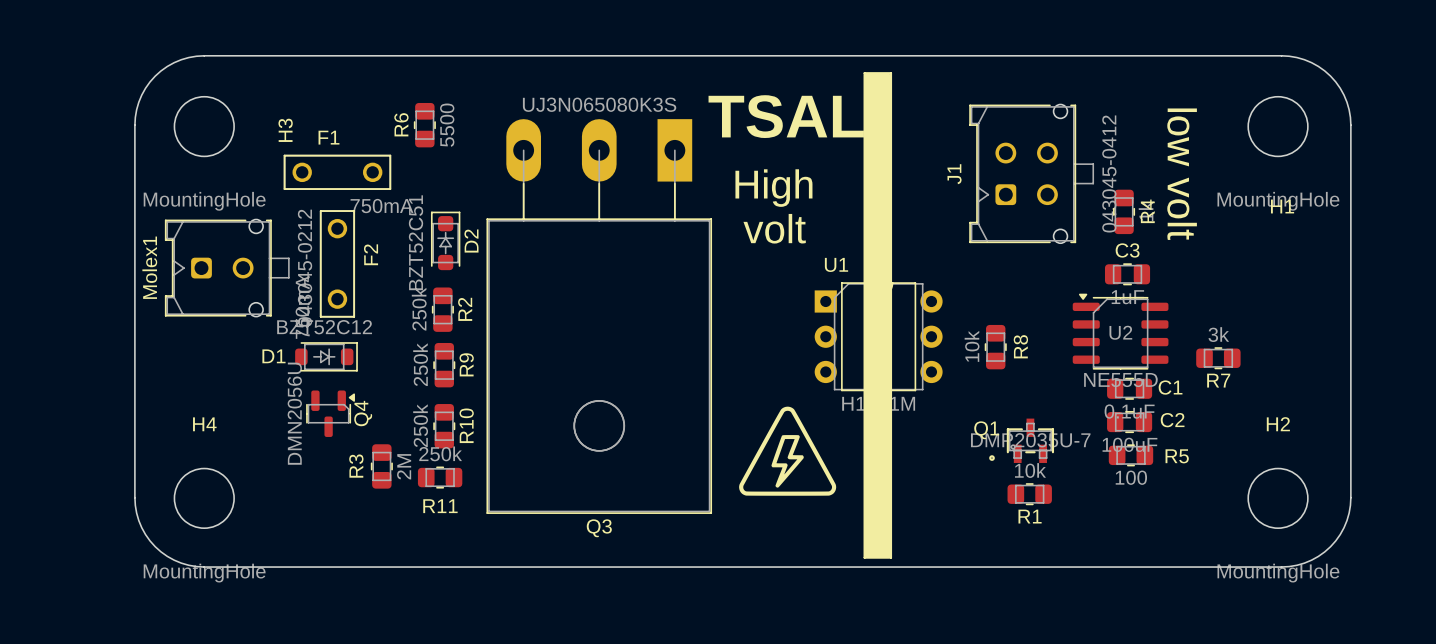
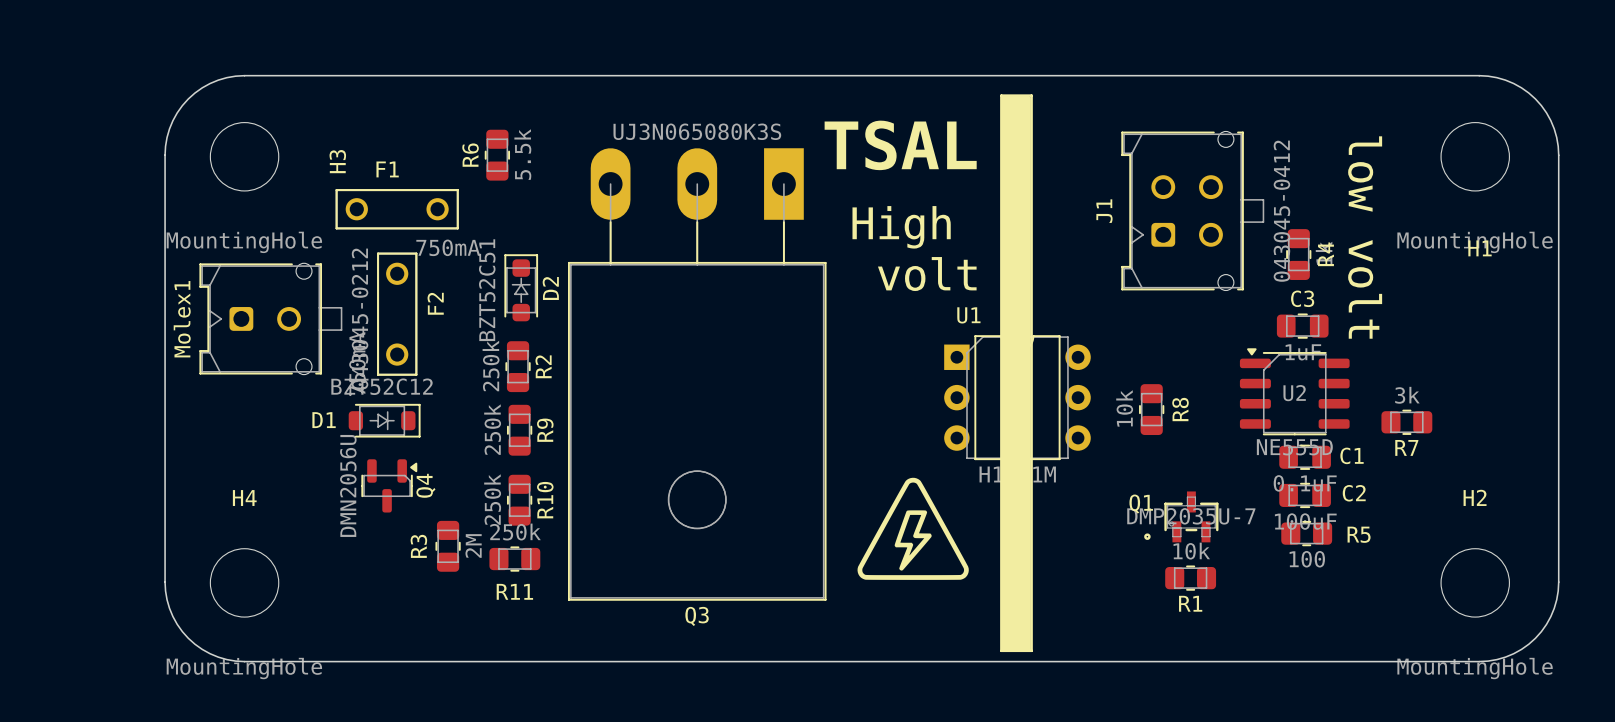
R6 value: 5500 (447, 125) -> 5.5k (522, 154)

